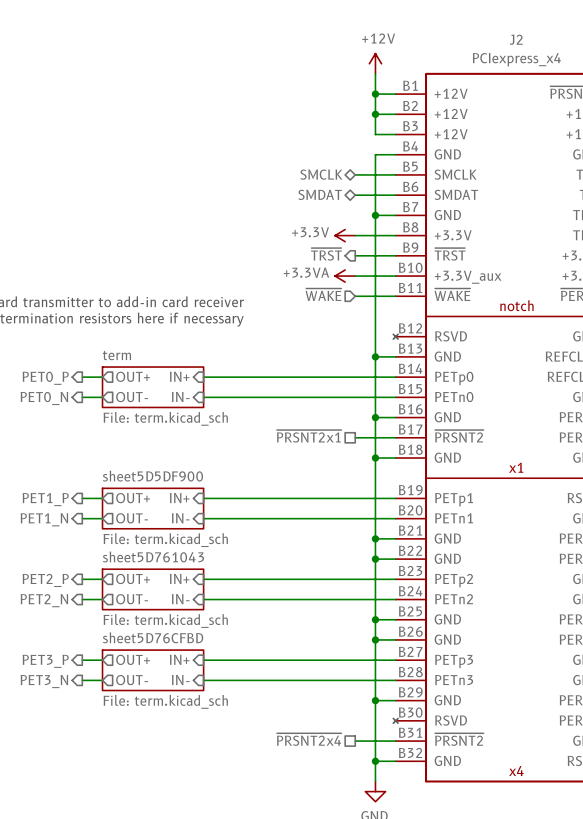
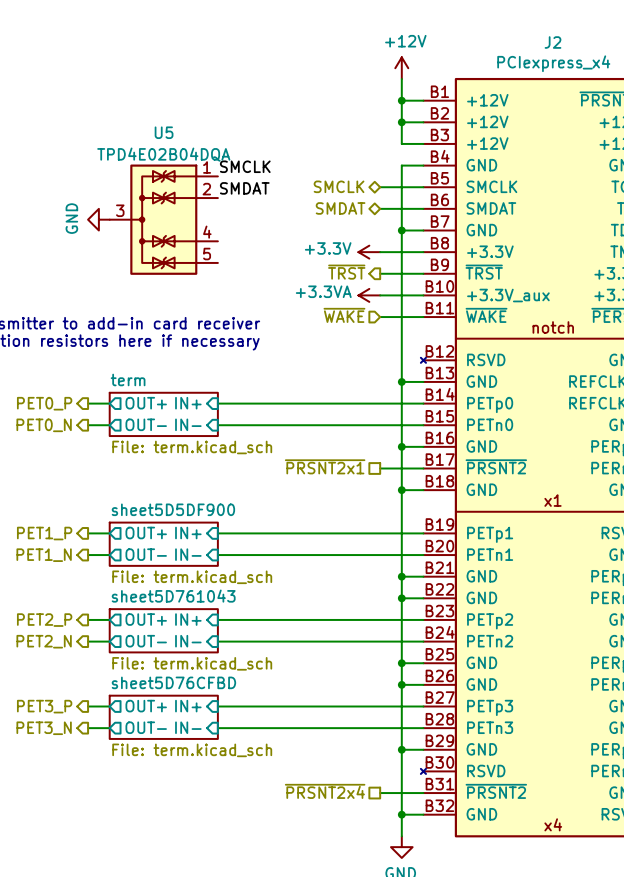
label: none -> SMCLK (245, 166)
label: none -> SMDAT (244, 188)
power symbol: none -> GND (98, 219)
U5: none -> TPD4E02B04DQA (163, 219)

